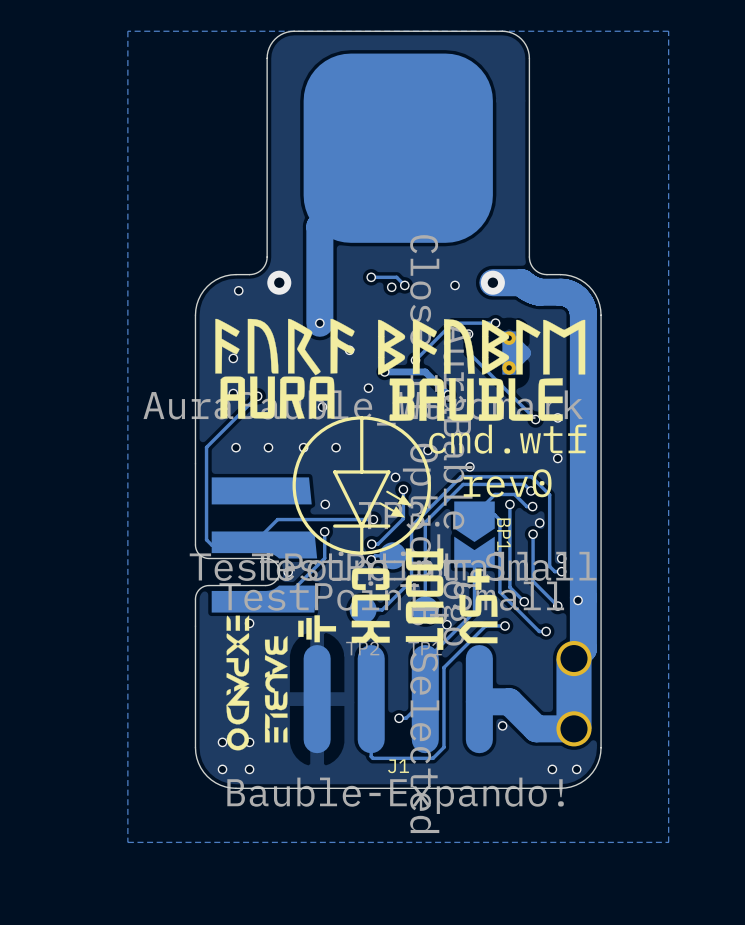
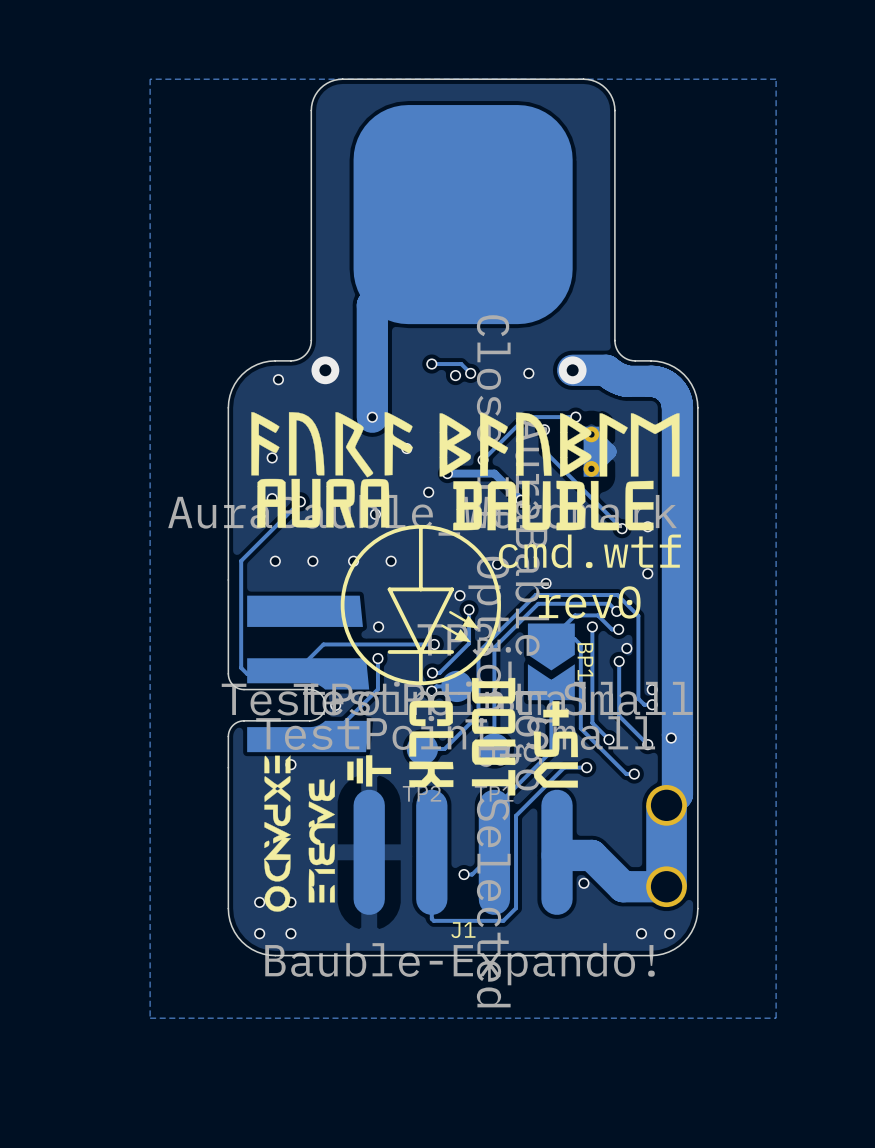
via: (446, 624) -> none

